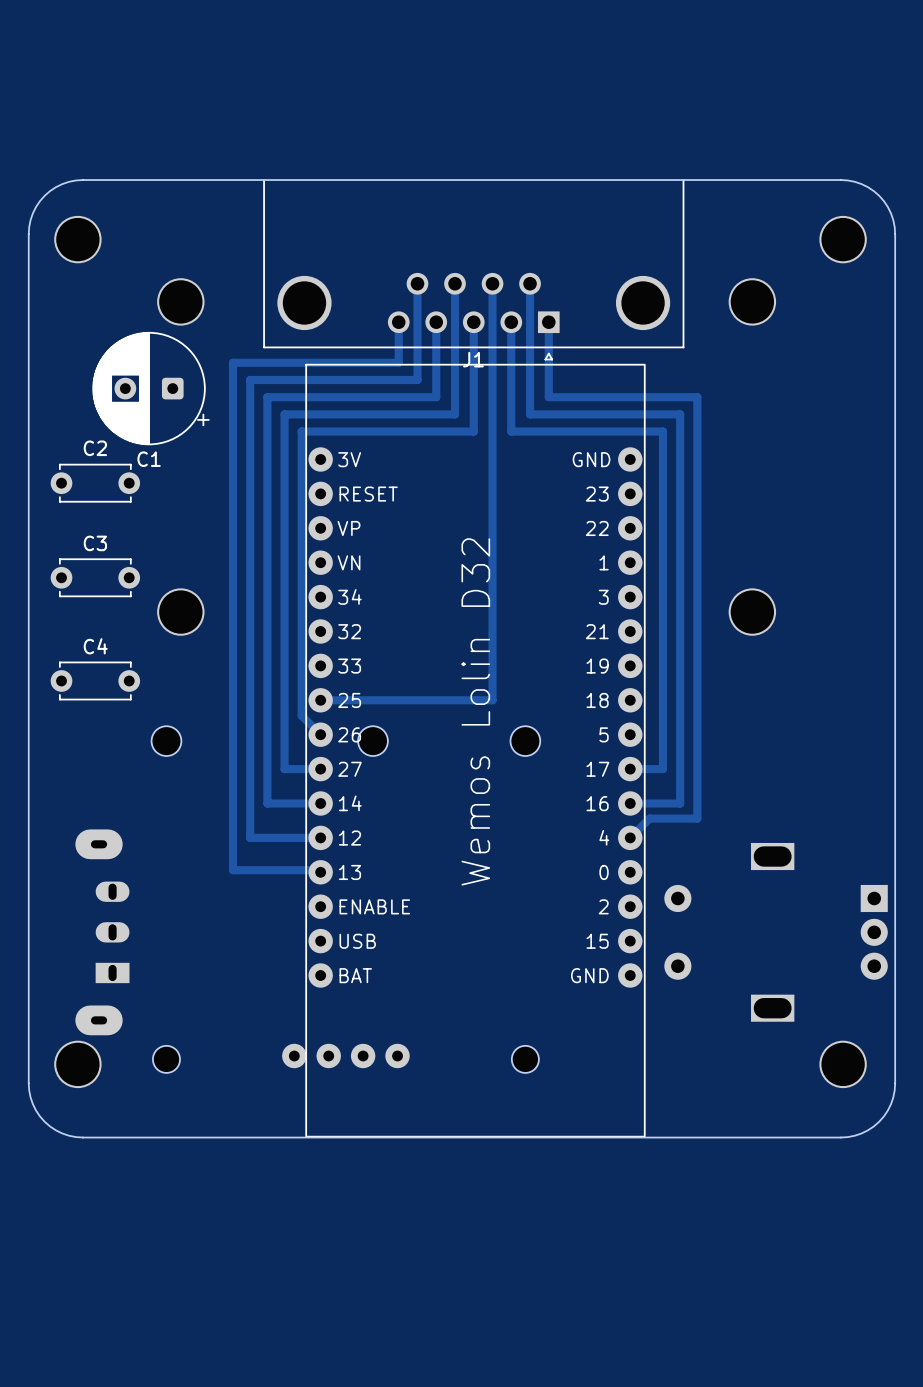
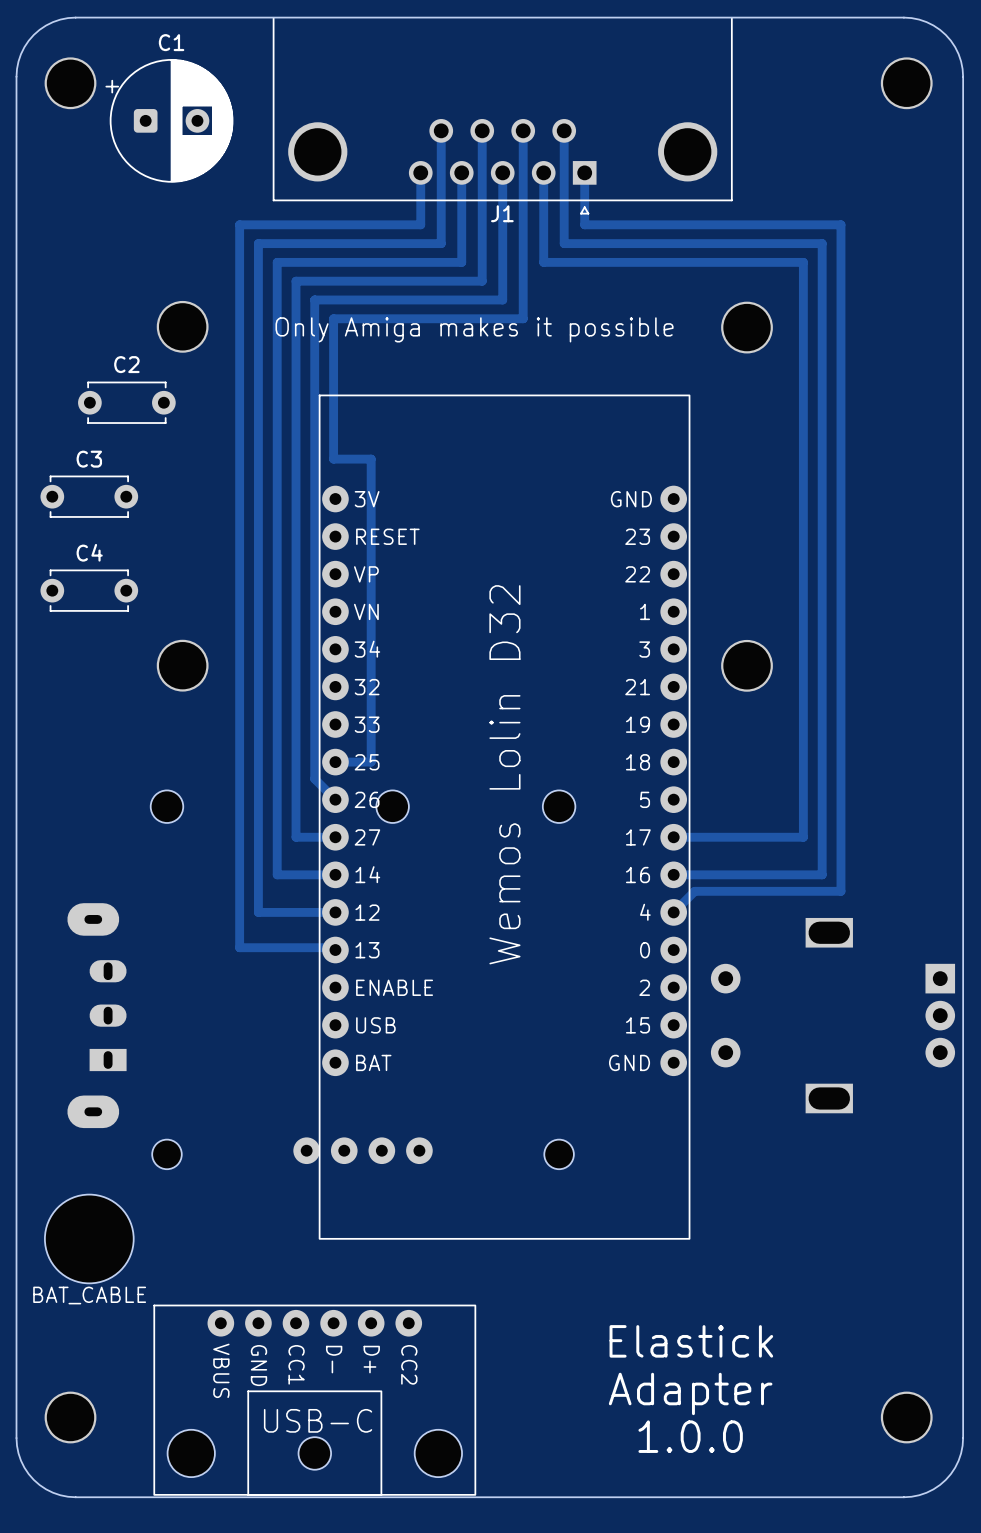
part: none -> (906, 83)
track: none -> (523, 130) (523, 307)
track: none -> (502, 172) (502, 299) (314, 299)
board edge: (28, 234) (32, 213) (44, 195) (62, 184) (82, 180) (848, 180) (868, 187) (879, 195) (891, 213) (895, 234) -> (16, 252) (16, 76) (18, 61) (24, 47) (39, 29) (60, 19) (75, 17) (903, 17) (919, 19) (939, 29) (950, 40) (958, 54) (962, 69) (963, 252)
part position: (77, 239) -> (70, 83)
part: (843, 239) -> none
J1 position: (473, 269) -> (502, 115)
track: (417, 283) (417, 379) (250, 379) -> (441, 130) (441, 243) (258, 243) (258, 412)
track: (455, 283) (455, 414) (284, 414) -> (482, 130) (482, 281) (296, 281) (296, 449)
track: (530, 283) (530, 414) (680, 414) (680, 803) -> (564, 130) (564, 243) (822, 243) (822, 874) (728, 874)
track: (492, 294) (492, 700) (353, 700) -> (523, 318) (333, 318) (333, 459) (371, 459) (371, 762)
part position: (752, 301) -> (747, 327)
text: none -> Only Amiga makes it possible (474, 329)
track: (398, 322) (398, 362) (232, 362) -> (420, 172) (420, 224) (239, 224) (239, 393)
track: (436, 322) (436, 397) (267, 397) -> (461, 172) (461, 262) (277, 262) (277, 430)
track: (473, 322) (473, 431) (301, 431) -> (314, 300) (314, 468)
track: (511, 322) (511, 431) (662, 431) (662, 769) -> (543, 172) (543, 262) (803, 262) (803, 837) (709, 837)
track: (548, 322) (548, 397) (697, 397) (697, 818) -> (584, 172) (584, 224) (840, 224) (840, 891) (747, 891)
C1 rotation: 0° (151, 388) -> 180° (169, 120)
C1 position: (151, 388) -> (169, 120)
C2 position: (95, 483) -> (126, 402)
C3 position: (95, 577) -> (89, 496)
part position: (752, 612) -> (747, 665)
C4 position: (95, 680) -> (89, 590)
part position: (77, 1064) -> (70, 1417)
part position: (843, 1064) -> (906, 1417)
board edge: (28, 1083) (32, 1104) (44, 1121) (62, 1133) (82, 1137) (848, 1137) (868, 1130) (879, 1121) (891, 1104) (895, 1083) -> (16, 1180) (17, 1445) (24, 1467) (39, 1485) (60, 1495) (75, 1497) (903, 1497) (926, 1492) (939, 1485) (950, 1474) (958, 1460) (962, 1445) (963, 1180)
BAT_CABLE: none -> (89, 1238)
text: none -> Elastick (691, 1341)
text: none -> Adapter (690, 1393)
part: none -> (314, 1400)
text: none -> 1.0.0 (690, 1436)

